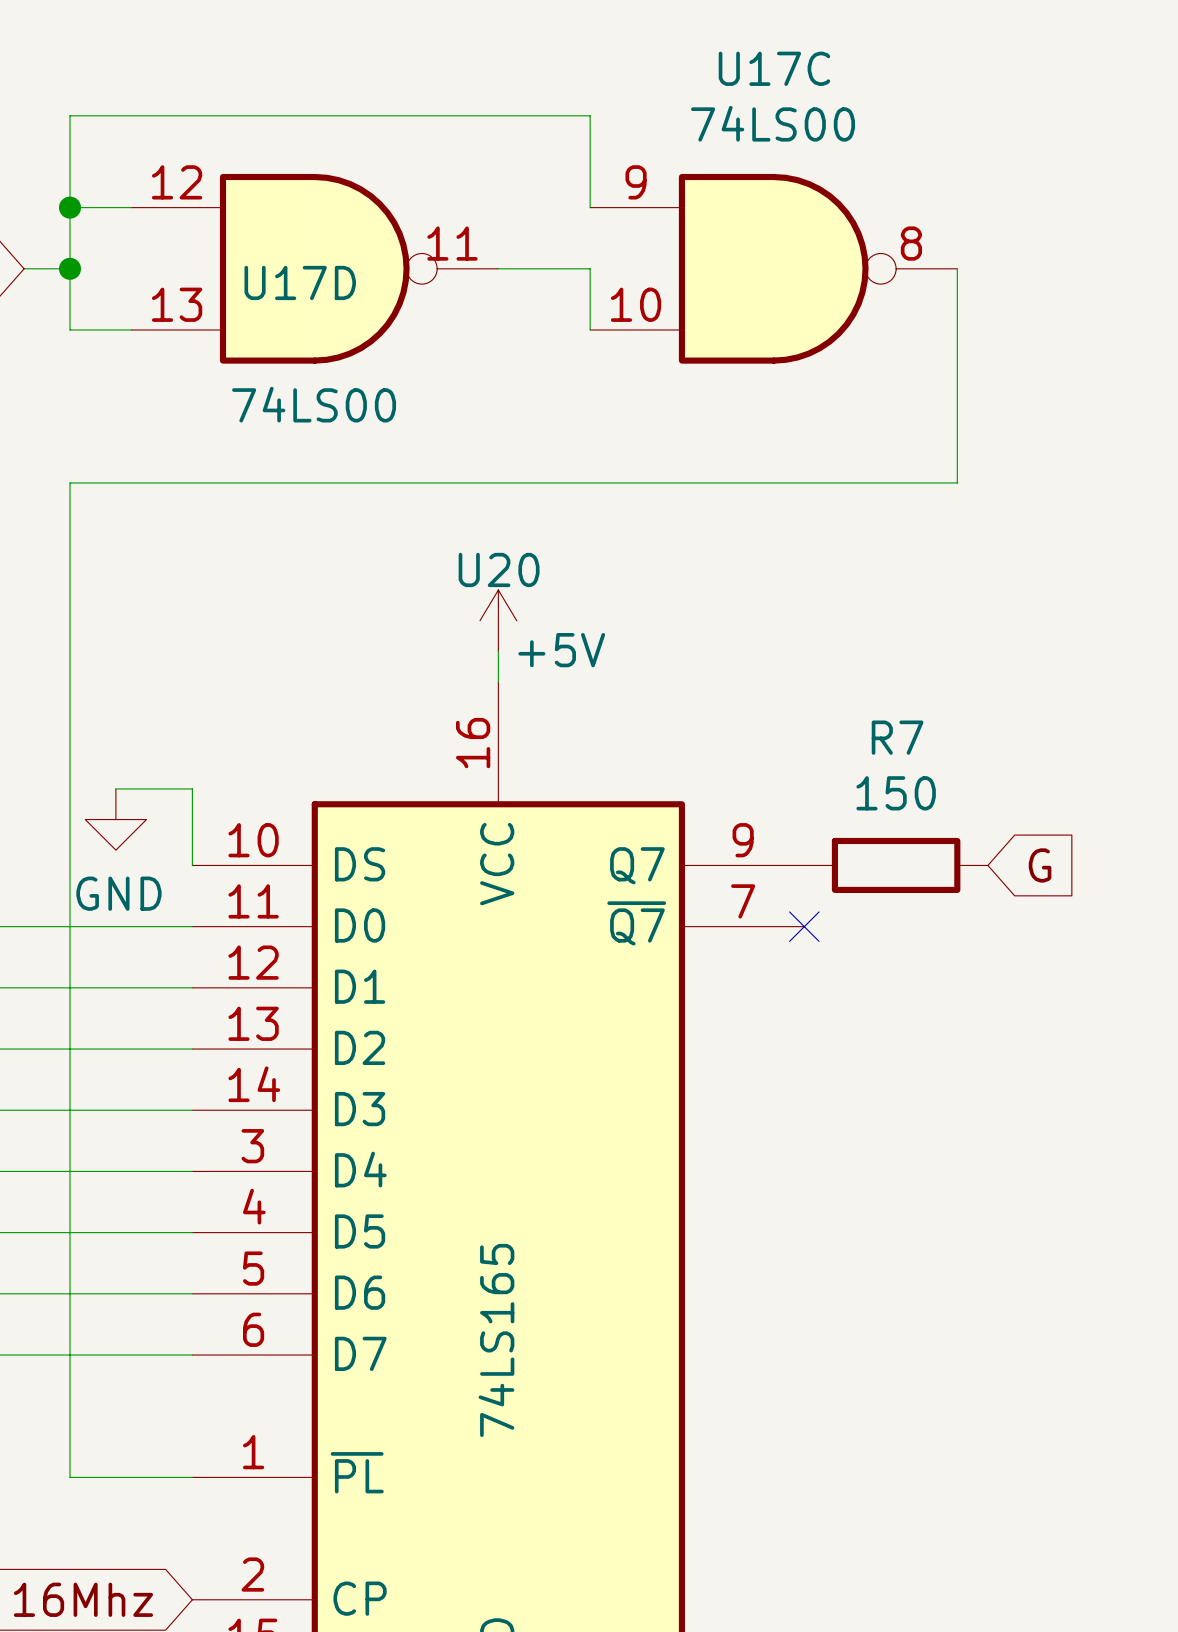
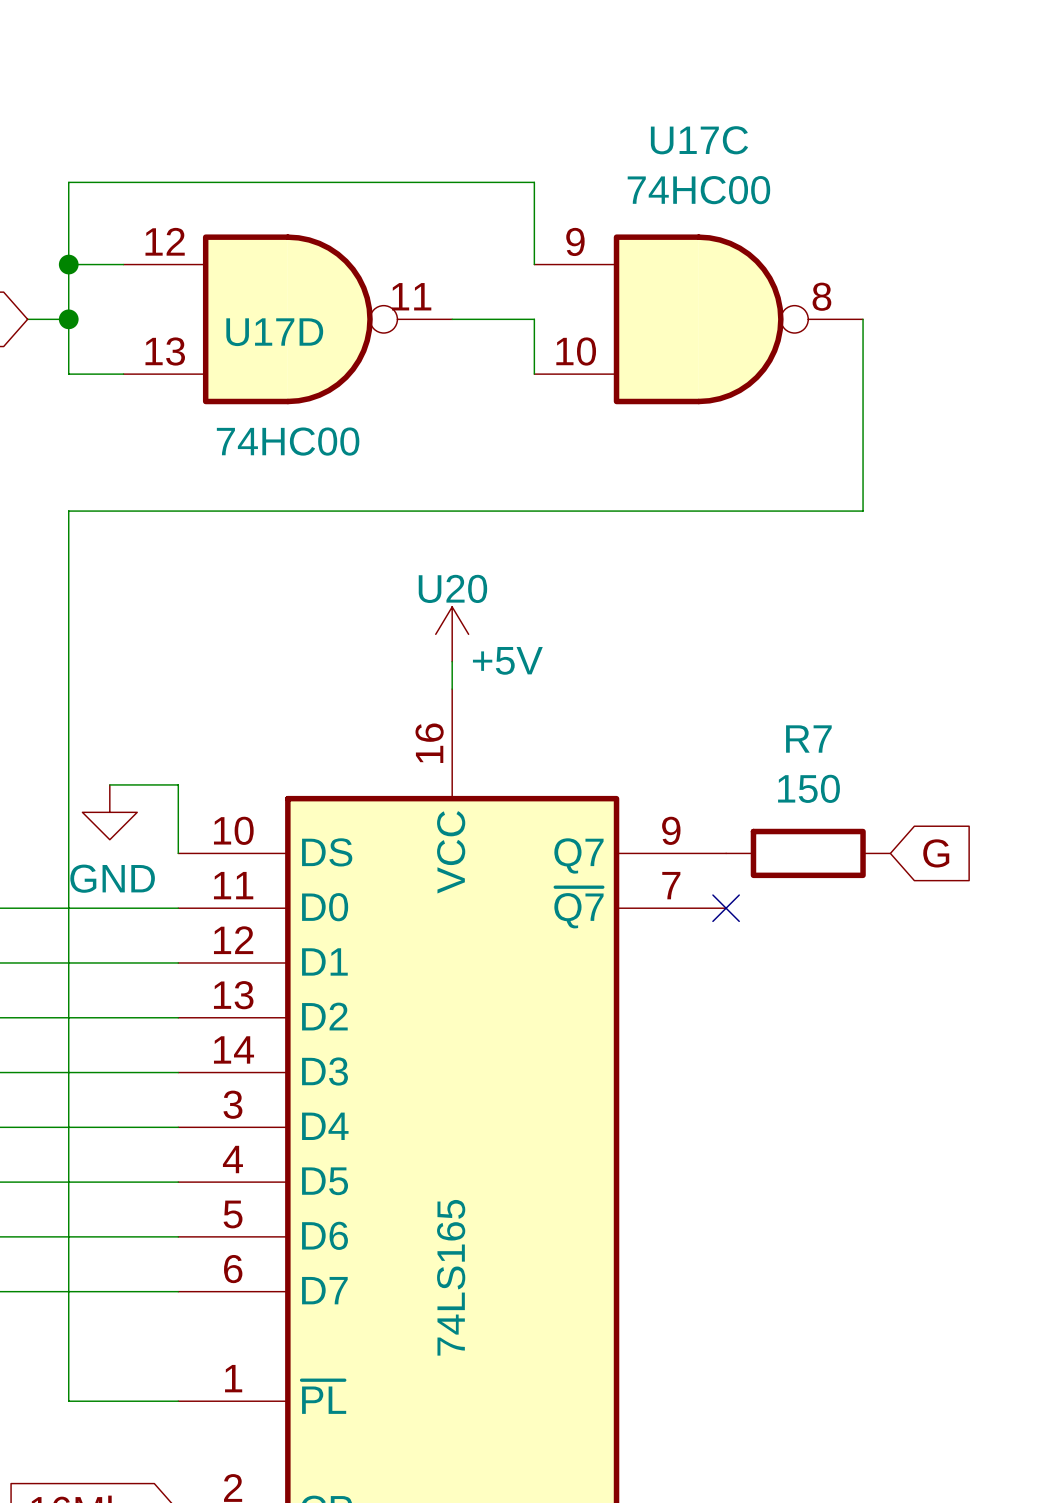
U17C value: 74LS00 (773, 123) -> 74HC00 (698, 190)
U17D value: 74LS00 (314, 404) -> 74HC00 (288, 441)

